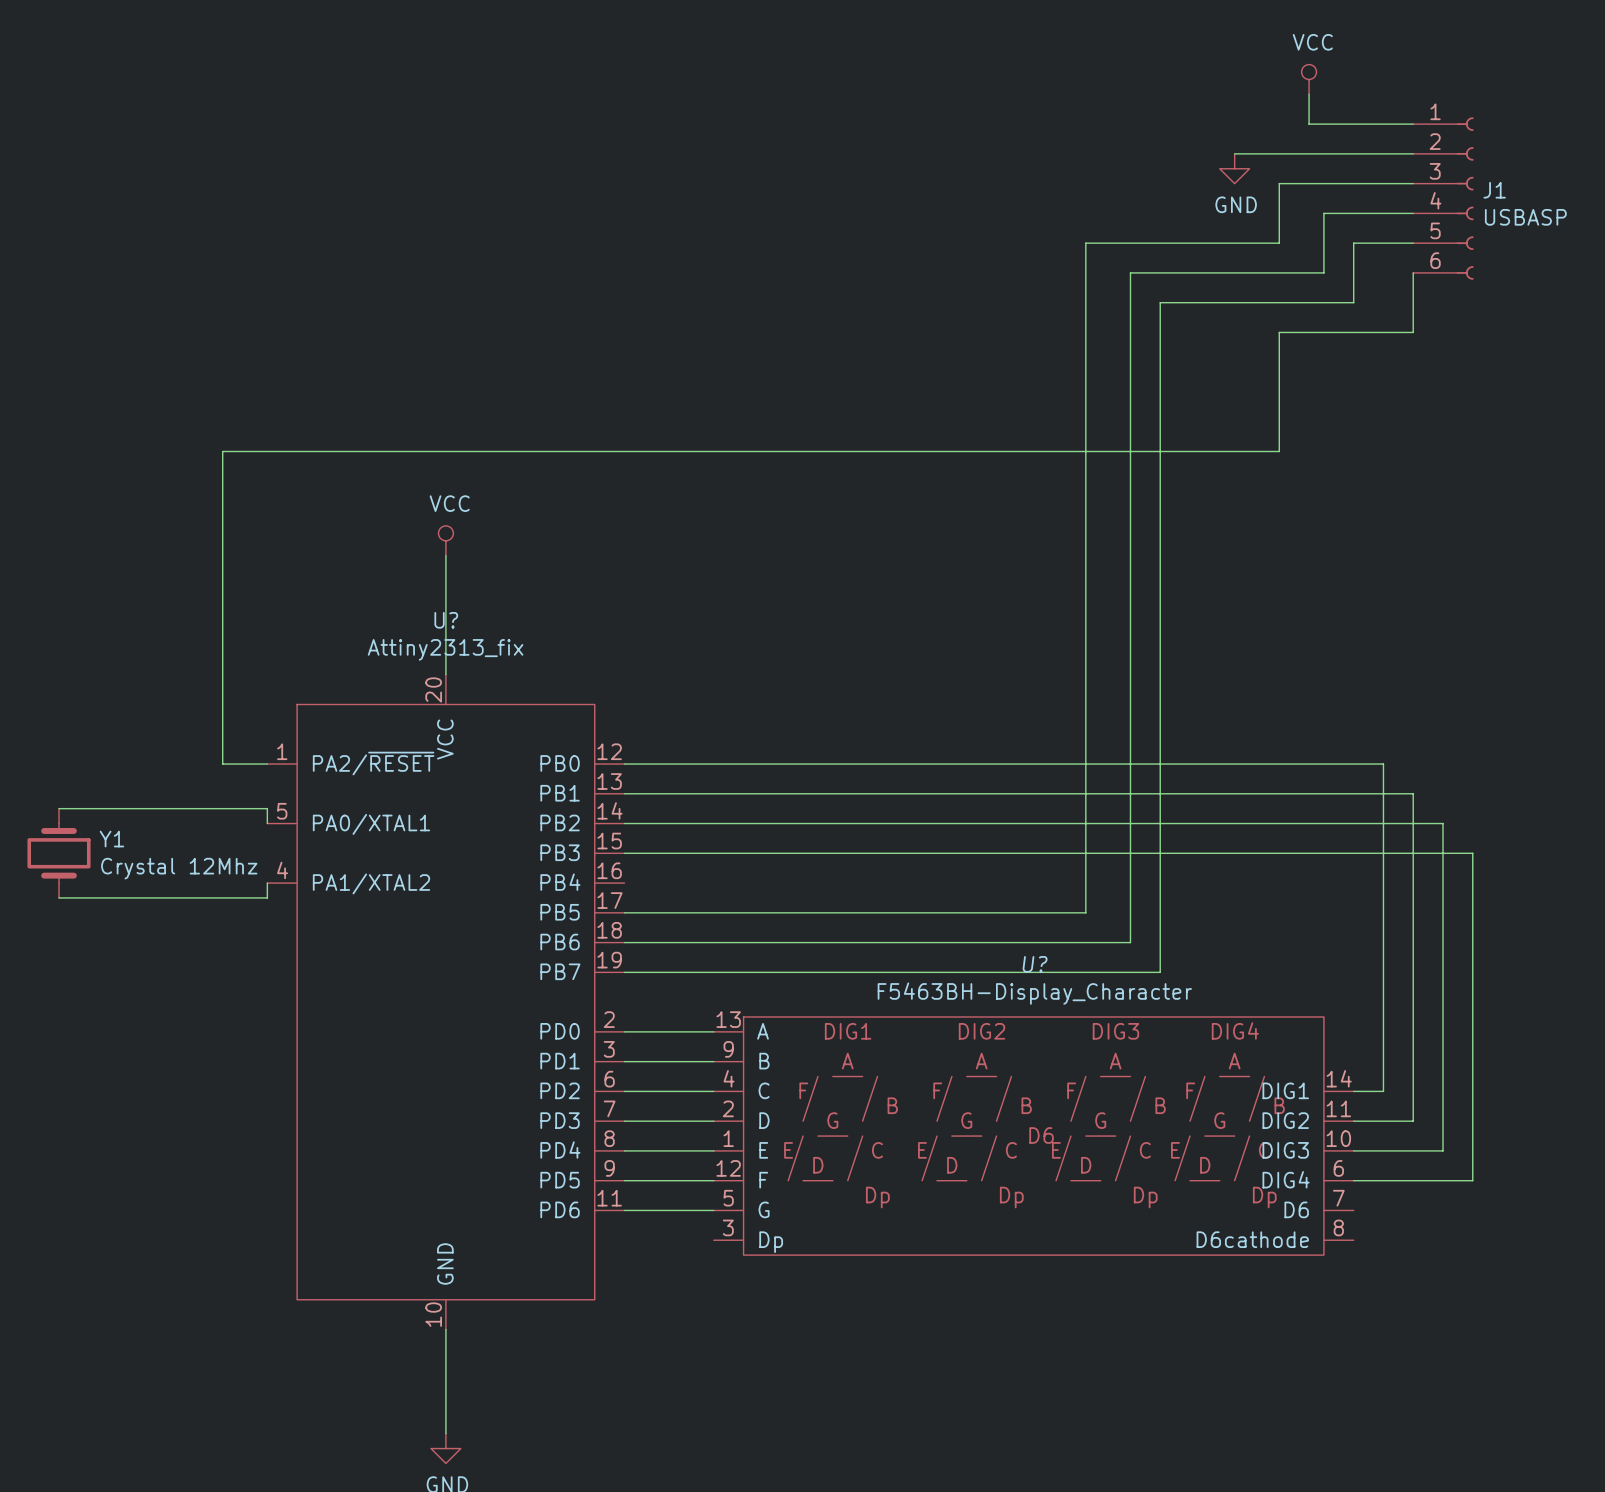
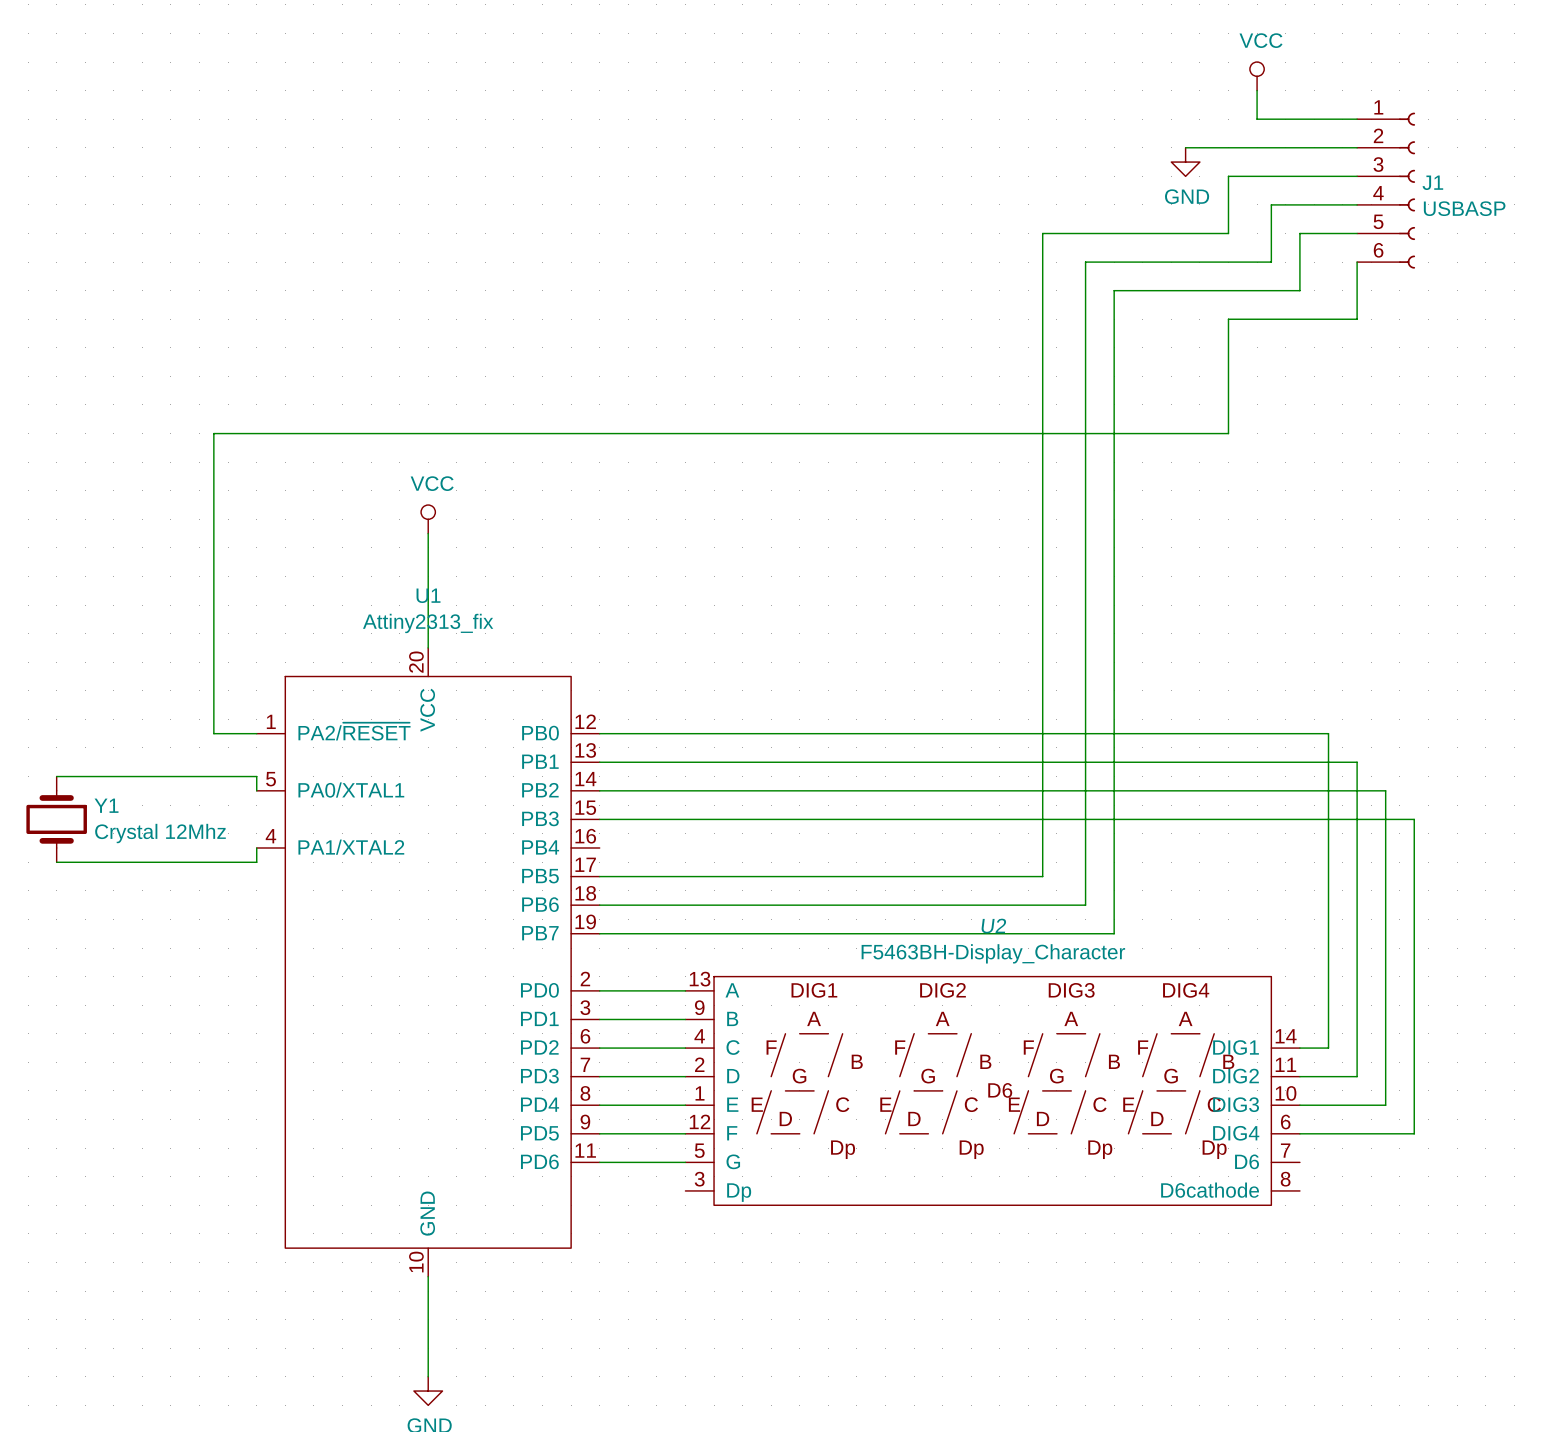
U? name: U? (446, 620) -> U1 (428, 595)
U? name: U? (1035, 964) -> U2 (993, 926)

